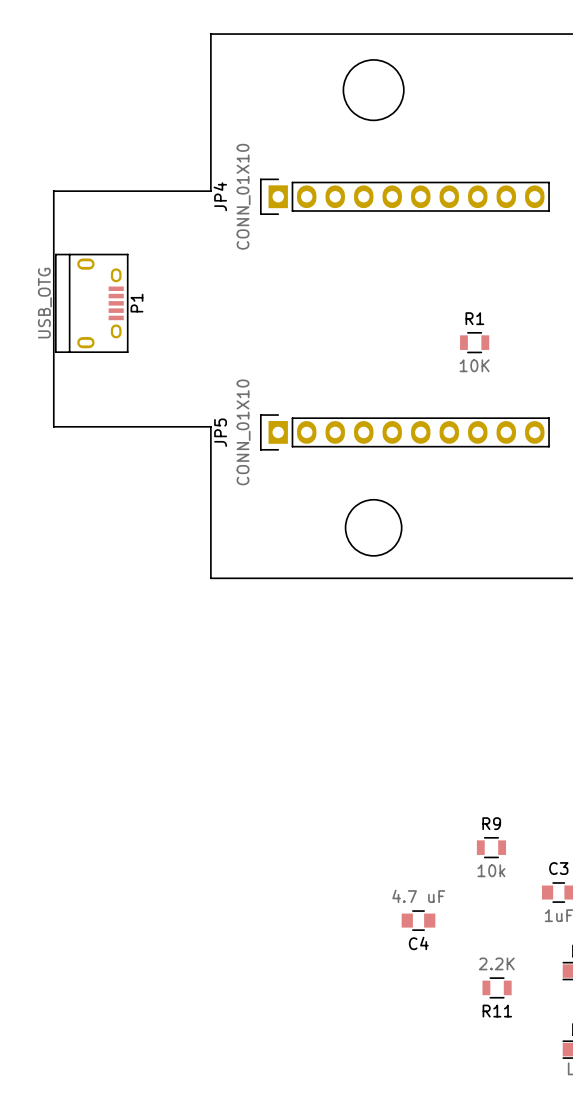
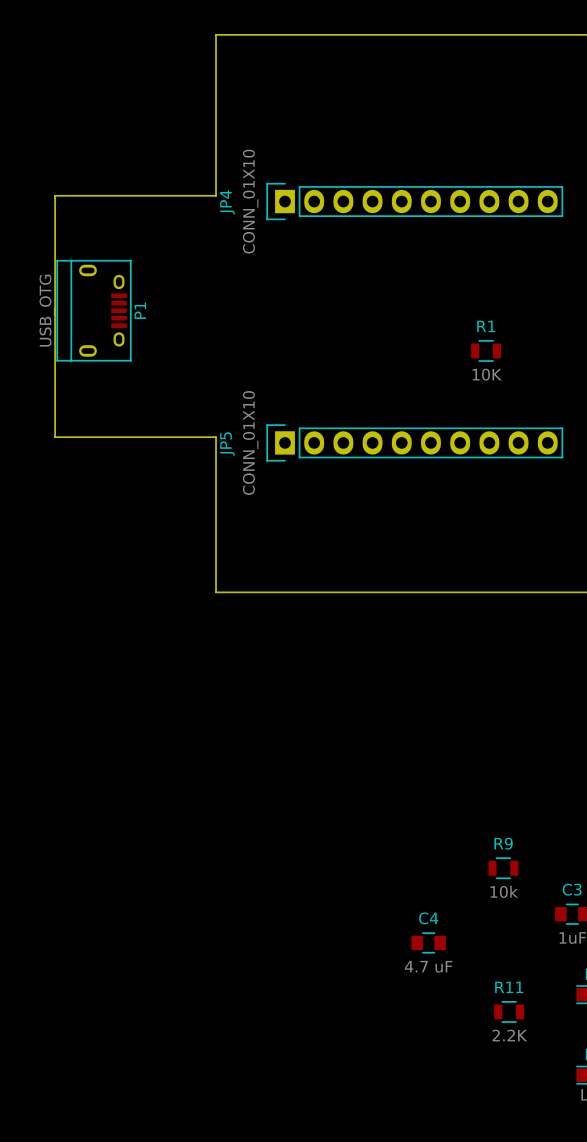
round board edge: [342, 59, 405, 122] -> none
round board edge: [344, 498, 403, 557] -> none
C4 value position: 4.7 uF (418, 896) -> 4.7 uF (428, 966)
C4 name position: C4 (418, 943) -> C4 (428, 918)
R11 value position: 2.2K (496, 963) -> 2.2K (509, 1035)
R11 name position: R11 (497, 1011) -> R11 (509, 987)

